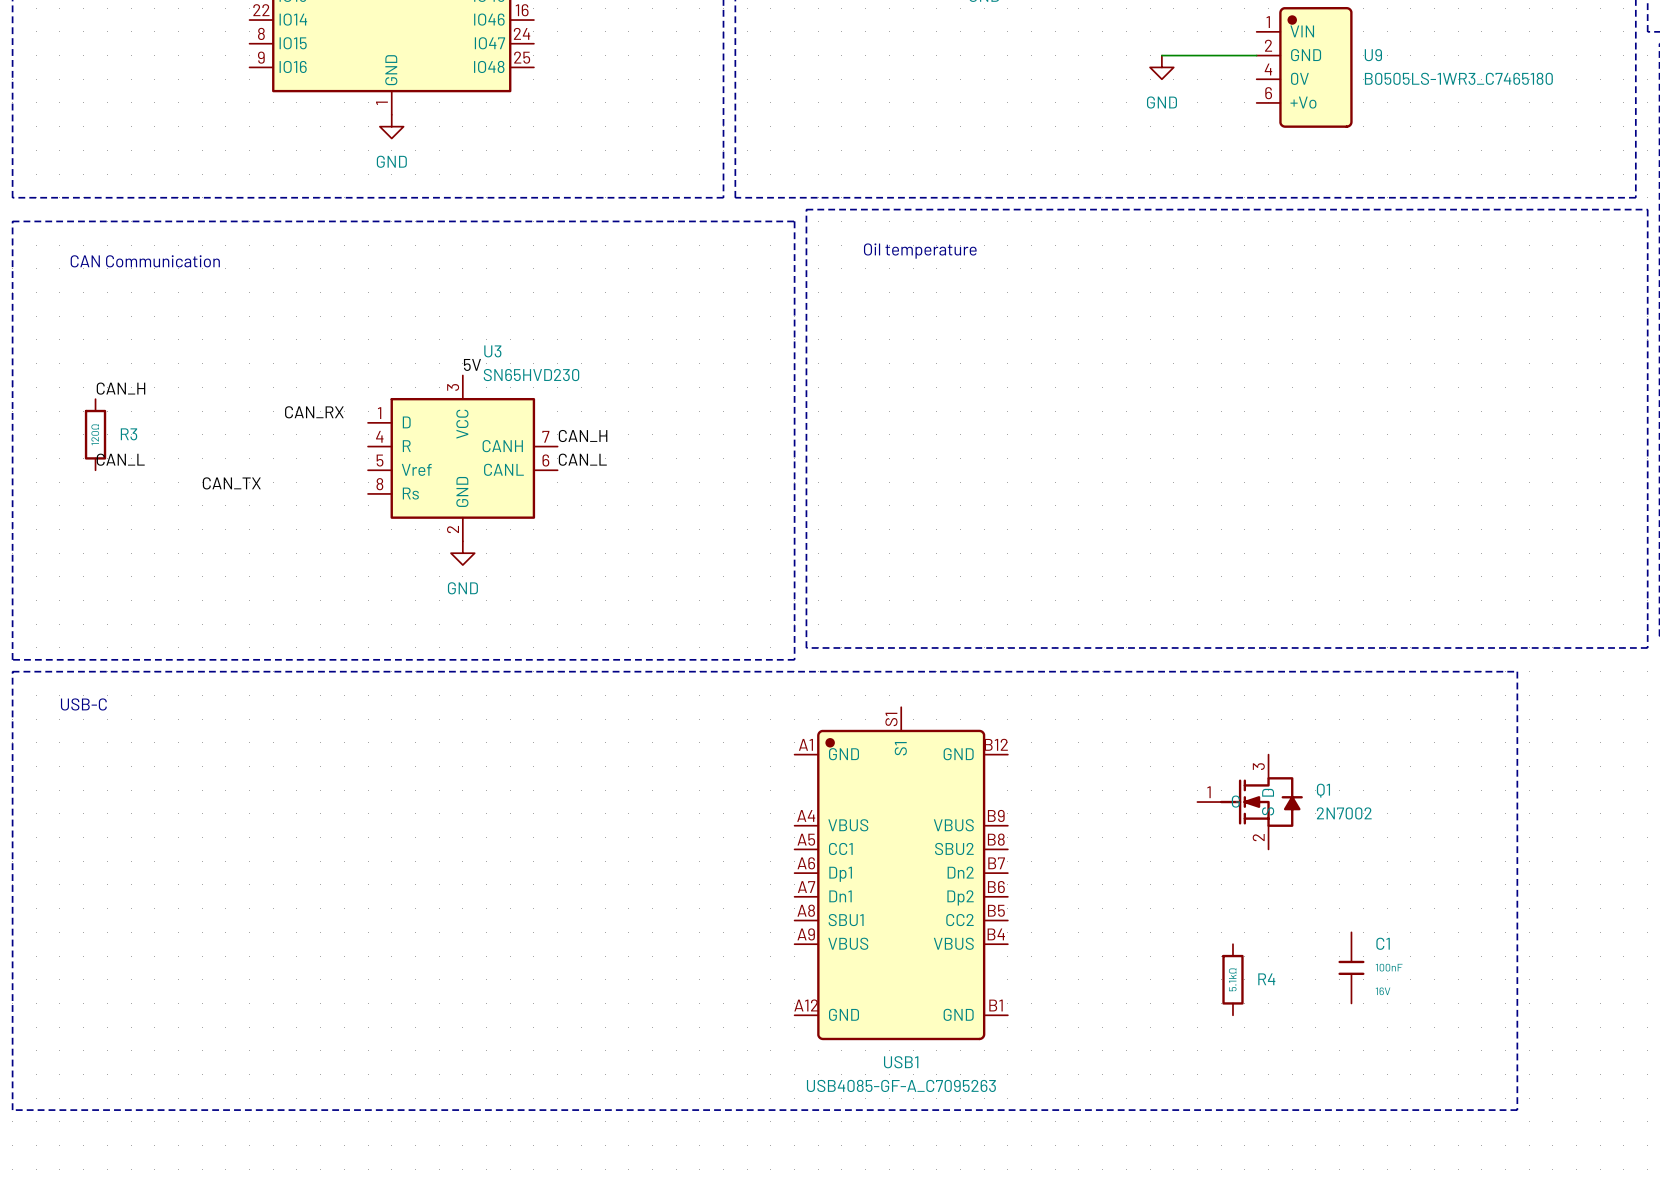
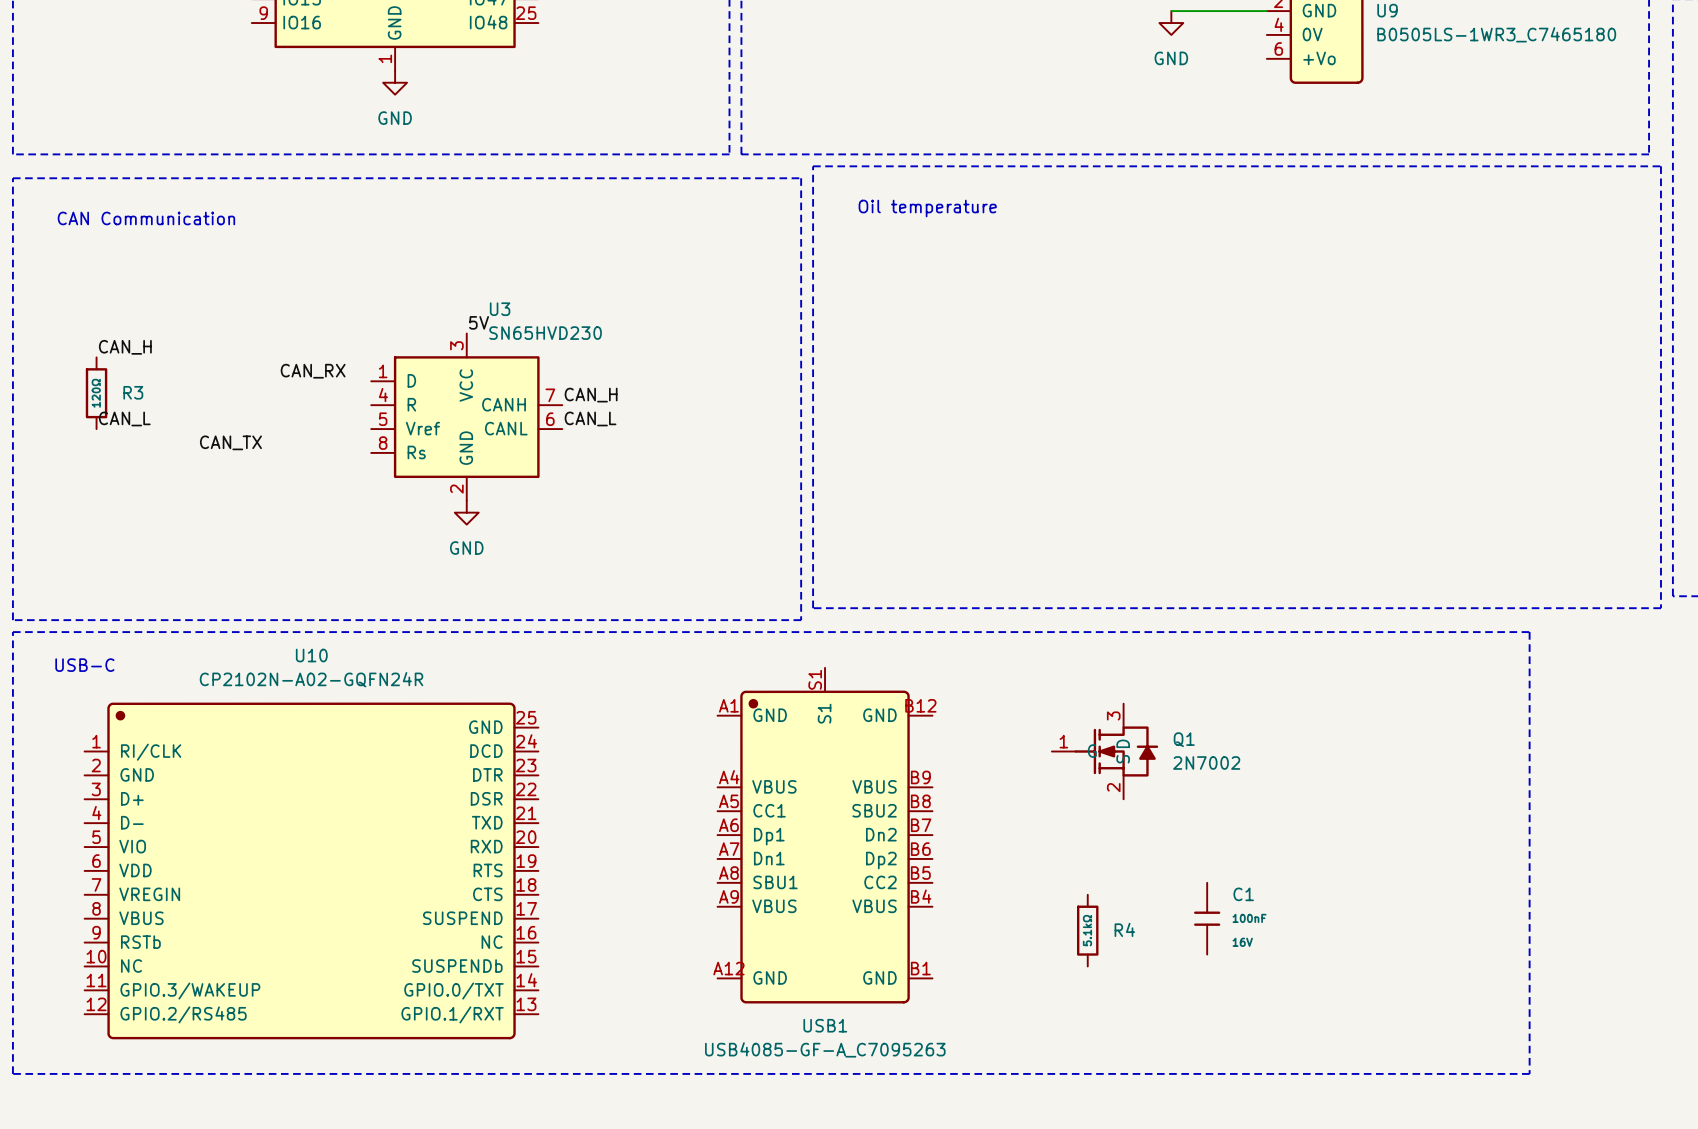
Q1 position: (1250, 802) -> (1105, 751)
USB1 position: (901, 873) -> (825, 835)
U10: none -> CP2102N-A02-GQFN24R (311, 870)
C1 position: (1351, 967) -> (1207, 918)
R4 position: (1232, 979) -> (1087, 930)

